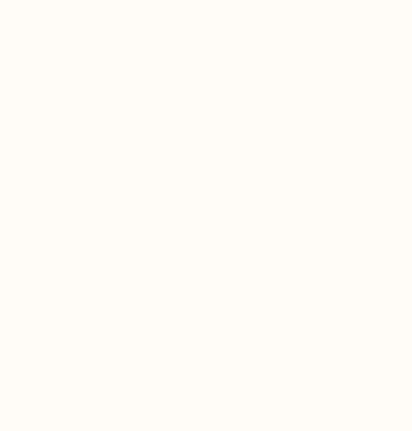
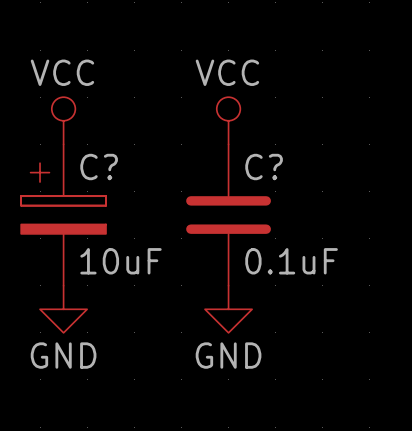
power symbol: none -> VCC (63, 120)
power symbol: none -> VCC (228, 120)
C?: none -> 10uF (63, 215)
C?: none -> 0.1uF (228, 215)
power symbol: none -> GND (63, 309)
power symbol: none -> GND (228, 309)

